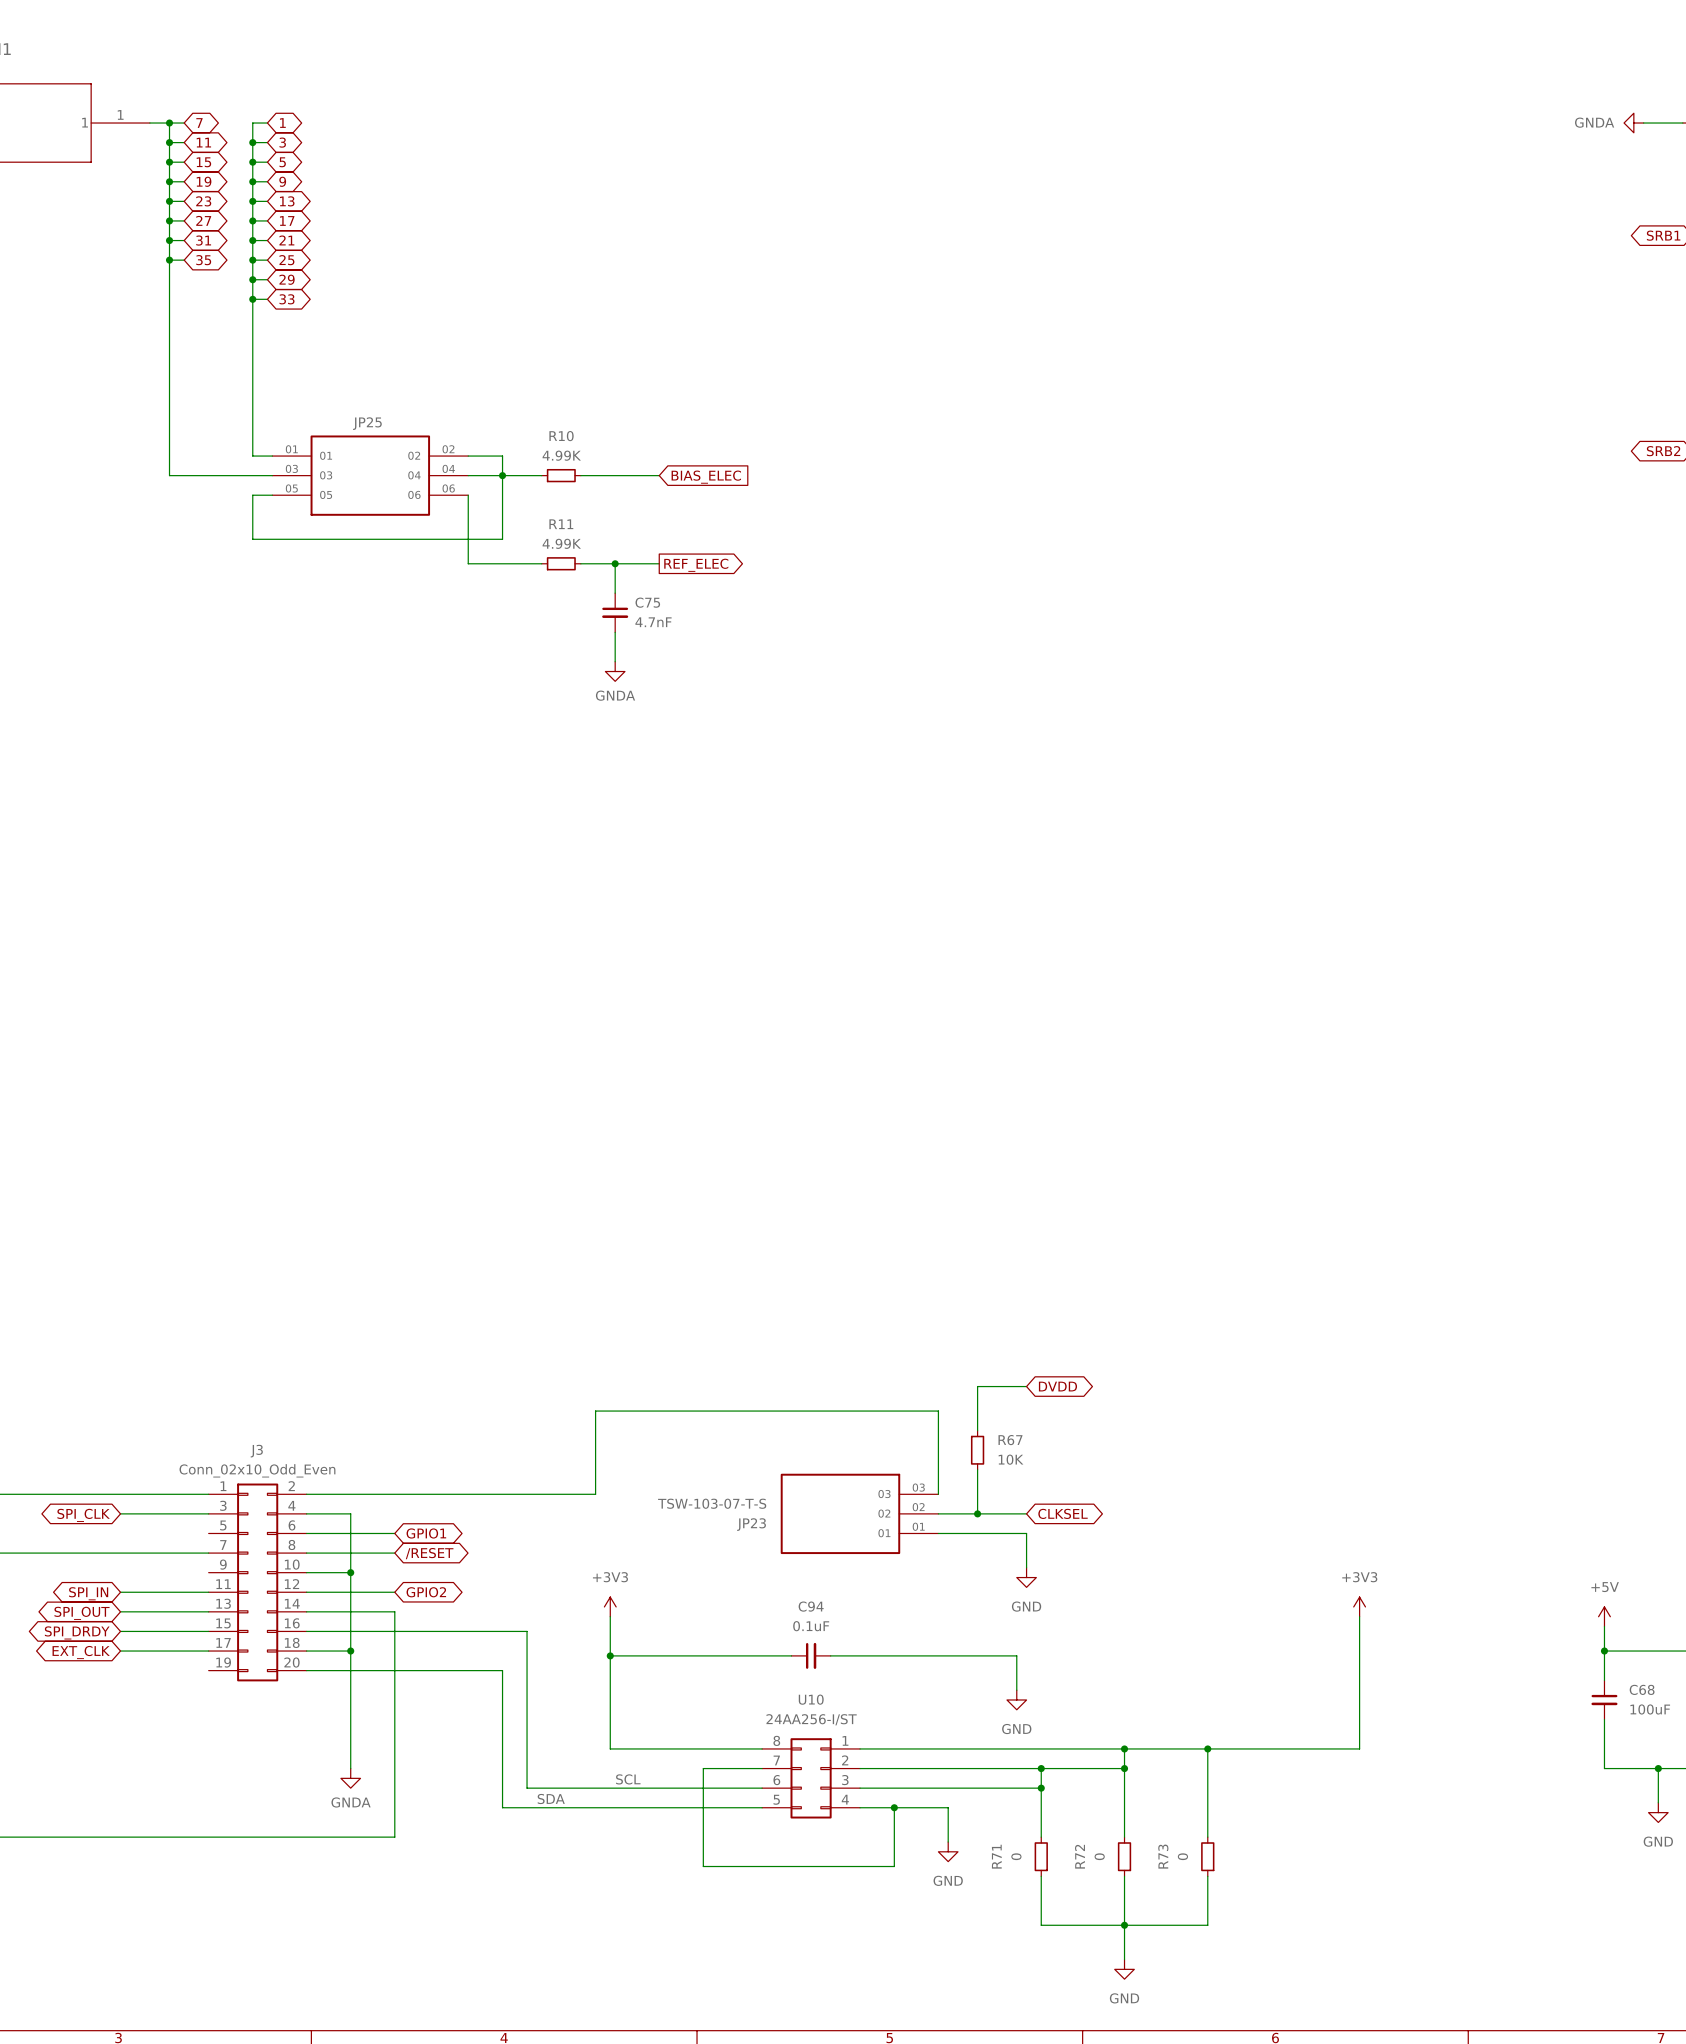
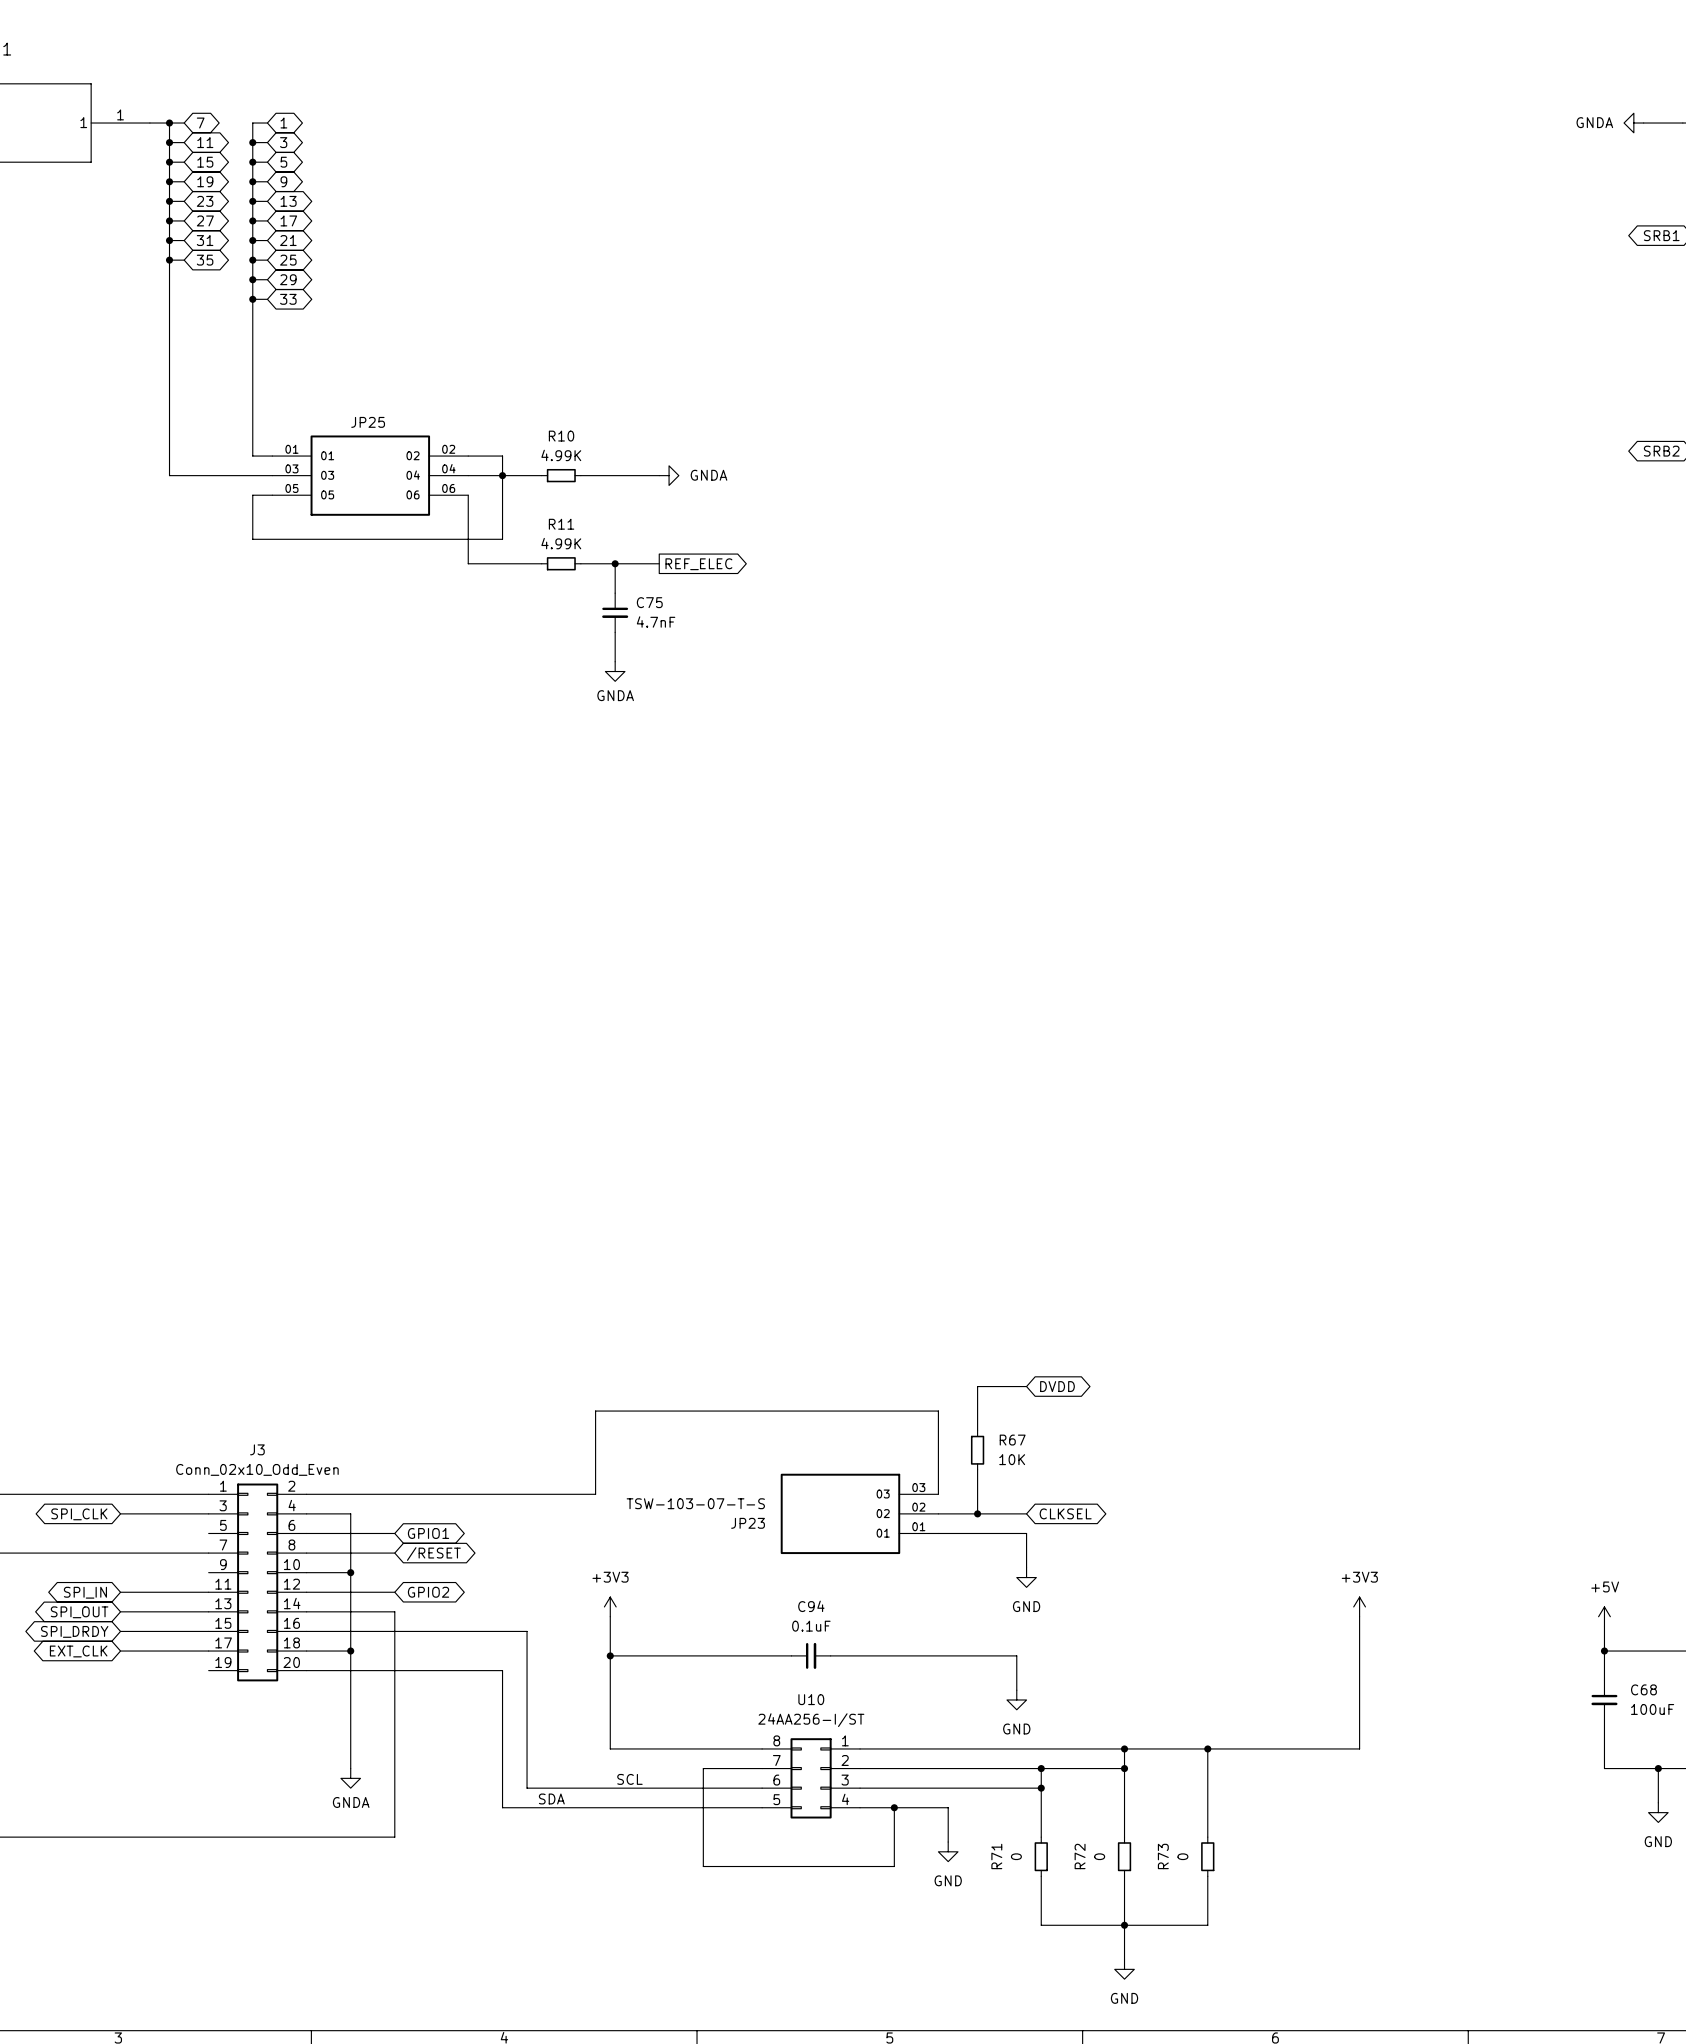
power symbol: none -> GNDA (669, 475)
global label: BIAS_ELEC (706, 477) -> none

